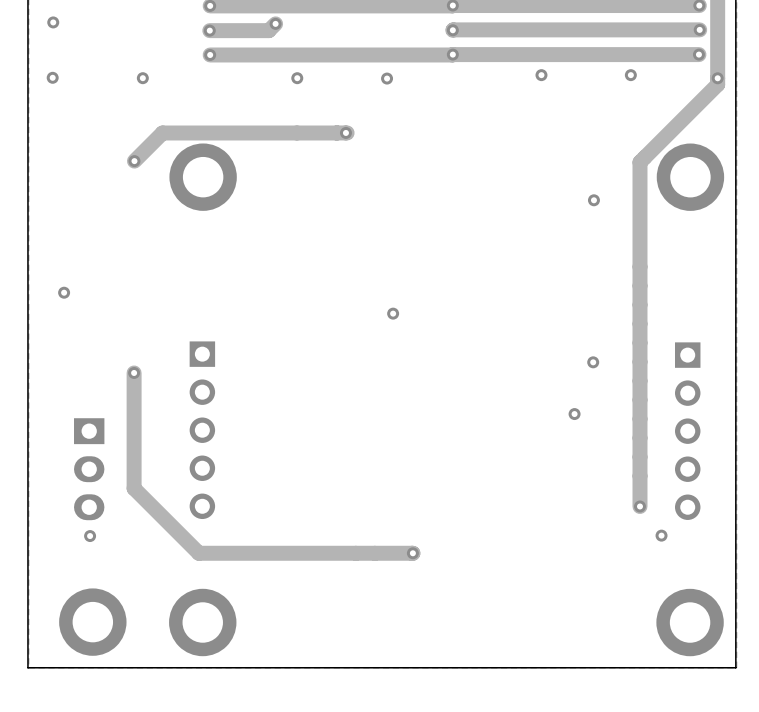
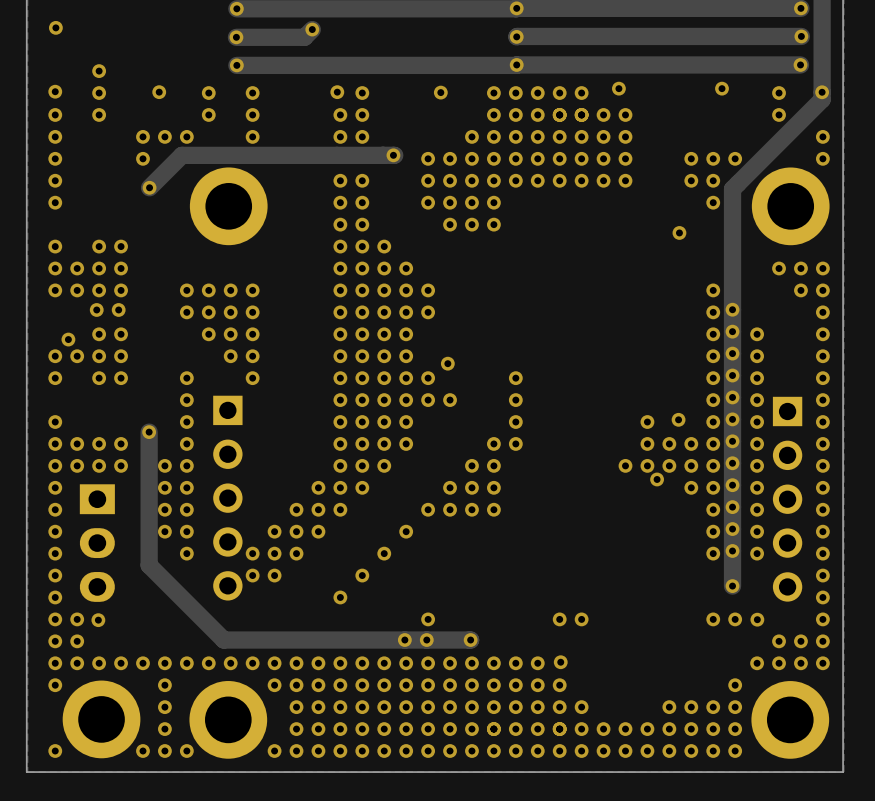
via: none -> (99, 71)
via: none -> (99, 93)
via: none -> (208, 93)
via: none -> (252, 93)
via: none -> (362, 93)
via: none -> (493, 93)
via: none -> (515, 93)
via: none -> (537, 93)
via: none -> (559, 93)
via: none -> (581, 93)
via: none -> (779, 93)
via: none -> (55, 114)
via: none -> (99, 114)
via: none -> (208, 114)
via: none -> (252, 114)
via: none -> (340, 114)
via: none -> (362, 114)
via: none -> (493, 114)
via: none -> (515, 114)
via: none -> (537, 114)
via: none -> (559, 114)
via: none -> (581, 114)
via: none -> (603, 114)
via: none -> (625, 114)
via: none -> (779, 114)
via: none -> (55, 136)
via: none -> (142, 136)
via: none -> (164, 136)
via: none -> (186, 136)
via: none -> (252, 136)
via: none -> (340, 136)
via: none -> (362, 136)
via: none -> (471, 136)
via: none -> (493, 136)
via: none -> (515, 136)
via: none -> (537, 136)
via: none -> (559, 136)
via: none -> (581, 136)
via: none -> (603, 136)
via: none -> (625, 136)
via: none -> (822, 136)
via: none -> (55, 158)
via: none -> (142, 158)
via: none -> (428, 158)
via: none -> (450, 158)
via: none -> (471, 158)
via: none -> (493, 158)
via: none -> (515, 158)
via: none -> (537, 158)
via: none -> (559, 158)
via: none -> (581, 158)
via: none -> (603, 158)
via: none -> (625, 158)
via: none -> (691, 158)
via: none -> (713, 158)
via: none -> (735, 158)
via: none -> (822, 158)
via: none -> (55, 180)
via: none -> (340, 180)
via: none -> (362, 180)
via: none -> (428, 180)
via: none -> (450, 180)
via: none -> (471, 180)
via: none -> (493, 180)
via: none -> (515, 180)
via: none -> (537, 180)
via: none -> (559, 180)
via: none -> (581, 180)
via: none -> (603, 180)
via: none -> (625, 180)
via: none -> (691, 180)
via: none -> (713, 180)
via: none -> (55, 202)
via: none -> (340, 202)
via: none -> (362, 202)
via: none -> (428, 202)
via: none -> (450, 202)
via: none -> (471, 202)
via: none -> (493, 202)
via: none -> (713, 202)
via: none -> (340, 224)
via: none -> (362, 224)
via: none -> (450, 224)
via: none -> (471, 224)
via: none -> (493, 224)
via: none -> (55, 246)
via: none -> (99, 246)
via: none -> (121, 246)
via: none -> (340, 246)
via: none -> (362, 246)
via: none -> (384, 246)
via: none -> (55, 268)
via: none -> (77, 268)
via: none -> (99, 268)
via: none -> (121, 268)
via: none -> (340, 268)
via: none -> (362, 268)
via: none -> (384, 268)
via: none -> (406, 268)
via: none -> (779, 268)
via: none -> (800, 268)
via: none -> (822, 268)
via: none -> (55, 290)
via: none -> (77, 290)
via: none -> (99, 290)
via: none -> (121, 290)
via: none -> (186, 290)
via: none -> (208, 290)
via: none -> (230, 290)
via: none -> (252, 290)
via: none -> (340, 290)
via: none -> (362, 290)
via: none -> (384, 290)
via: none -> (406, 290)
via: none -> (428, 290)
via: none -> (713, 290)
via: none -> (800, 290)
via: none -> (822, 290)
via: none -> (732, 309)
via: none -> (96, 309)
via: none -> (118, 309)
via: none -> (186, 312)
via: none -> (208, 312)
via: none -> (230, 312)
via: none -> (252, 312)
via: none -> (340, 312)
via: none -> (362, 312)
via: none -> (384, 312)
via: none -> (406, 312)
via: none -> (428, 312)
via: none -> (713, 312)
via: none -> (822, 312)
via: none -> (732, 331)
via: none -> (99, 334)
via: none -> (121, 334)
via: none -> (208, 334)
via: none -> (230, 334)
via: none -> (252, 334)
via: none -> (340, 334)
via: none -> (362, 334)
via: none -> (384, 334)
via: none -> (406, 334)
via: none -> (713, 334)
via: none -> (757, 334)
via: none -> (822, 334)
via: none -> (732, 353)
via: none -> (55, 356)
via: none -> (77, 356)
via: none -> (99, 356)
via: none -> (121, 356)
via: none -> (230, 356)
via: none -> (252, 356)
via: none -> (340, 356)
via: none -> (362, 356)
via: none -> (384, 356)
via: none -> (406, 356)
via: none -> (713, 356)
via: none -> (757, 356)
via: none -> (822, 356)
via: none -> (732, 375)
via: none -> (55, 378)
via: none -> (99, 378)
via: none -> (121, 378)
via: none -> (186, 378)
via: none -> (252, 378)
via: none -> (340, 378)
via: none -> (362, 378)
via: none -> (384, 378)
via: none -> (406, 378)
via: none -> (428, 378)
via: none -> (515, 378)
via: none -> (713, 378)
via: none -> (757, 378)
via: none -> (822, 378)
via: none -> (732, 397)
via: none -> (186, 400)
via: none -> (340, 400)
via: none -> (362, 400)
via: none -> (384, 400)
via: none -> (406, 400)
via: none -> (428, 400)
via: none -> (450, 400)
via: none -> (515, 400)
via: none -> (713, 400)
via: none -> (757, 400)
via: none -> (822, 400)
via: none -> (732, 419)
via: none -> (55, 422)
via: none -> (186, 422)
via: none -> (340, 422)
via: none -> (362, 422)
via: none -> (384, 422)
via: none -> (406, 422)
via: none -> (515, 422)
via: none -> (647, 422)
via: none -> (713, 422)
via: none -> (757, 422)
via: none -> (822, 422)
via: none -> (732, 441)
via: none -> (55, 443)
via: none -> (77, 443)
via: none -> (99, 443)
via: none -> (121, 443)
via: none -> (186, 443)
via: none -> (340, 443)
via: none -> (362, 443)
via: none -> (384, 443)
via: none -> (406, 443)
via: none -> (493, 443)
via: none -> (515, 443)
via: none -> (647, 443)
via: none -> (669, 443)
via: none -> (691, 443)
via: none -> (713, 443)
via: none -> (757, 443)
via: none -> (822, 443)
via: none -> (732, 463)
via: none -> (55, 465)
via: none -> (77, 465)
via: none -> (99, 465)
via: none -> (121, 465)
via: none -> (164, 465)
via: none -> (186, 465)
via: none -> (340, 465)
via: none -> (362, 465)
via: none -> (384, 465)
via: none -> (471, 465)
via: none -> (493, 465)
via: none -> (625, 465)
via: none -> (647, 465)
via: none -> (669, 465)
via: none -> (691, 465)
via: none -> (713, 465)
via: none -> (757, 465)
via: none -> (822, 465)
via: none -> (732, 485)
via: none -> (55, 487)
via: none -> (164, 487)
via: none -> (186, 487)
via: none -> (318, 487)
via: none -> (340, 487)
via: none -> (362, 487)
via: none -> (450, 487)
via: none -> (471, 487)
via: none -> (493, 487)
via: none -> (691, 487)
via: none -> (713, 487)
via: none -> (757, 487)
via: none -> (822, 487)
via: none -> (732, 507)
via: none -> (55, 509)
via: none -> (164, 509)
via: none -> (186, 509)
via: none -> (296, 509)
via: none -> (318, 509)
via: none -> (340, 509)
via: none -> (428, 509)
via: none -> (450, 509)
via: none -> (471, 509)
via: none -> (493, 509)
via: none -> (713, 509)
via: none -> (757, 509)
via: none -> (822, 509)
via: none -> (732, 529)
via: none -> (55, 531)
via: none -> (164, 531)
via: none -> (186, 531)
via: none -> (274, 531)
via: none -> (296, 531)
via: none -> (318, 531)
via: none -> (406, 531)
via: none -> (713, 531)
via: none -> (757, 531)
via: none -> (822, 531)
via: none -> (732, 550)
via: none -> (55, 553)
via: none -> (186, 553)
via: none -> (252, 553)
via: none -> (274, 553)
via: none -> (296, 553)
via: none -> (384, 553)
via: none -> (713, 553)
via: none -> (757, 553)
via: none -> (822, 553)
via: none -> (55, 575)
via: none -> (252, 575)
via: none -> (274, 575)
via: none -> (362, 575)
via: none -> (822, 575)
via: none -> (55, 597)
via: none -> (340, 597)
via: none -> (822, 597)
via: none -> (55, 619)
via: none -> (77, 619)
via: none -> (428, 619)
via: none -> (559, 619)
via: none -> (581, 619)
via: none -> (713, 619)
via: none -> (735, 619)
via: none -> (822, 619)
via: none -> (404, 640)
via: none -> (426, 640)
via: none -> (55, 641)
via: none -> (77, 641)
via: none -> (779, 641)
via: none -> (800, 641)
via: none -> (822, 641)
via: none -> (560, 662)
via: none -> (55, 663)
via: none -> (77, 663)
via: none -> (99, 663)
via: none -> (121, 663)
via: none -> (142, 663)
via: none -> (164, 663)
via: none -> (186, 663)
via: none -> (208, 663)
via: none -> (230, 663)
via: none -> (252, 663)
via: none -> (274, 663)
via: none -> (296, 663)
via: none -> (318, 663)
via: none -> (340, 663)
via: none -> (362, 663)
via: none -> (384, 663)
via: none -> (406, 663)
via: none -> (428, 663)
via: none -> (450, 663)
via: none -> (471, 663)
via: none -> (493, 663)
via: none -> (515, 663)
via: none -> (537, 663)
via: none -> (757, 663)
via: none -> (779, 663)
via: none -> (800, 663)
via: none -> (822, 663)
via: none -> (55, 685)
via: none -> (164, 685)
via: none -> (274, 685)
via: none -> (296, 685)
via: none -> (318, 685)
via: none -> (340, 685)
via: none -> (362, 685)
via: none -> (384, 685)
via: none -> (406, 685)
via: none -> (428, 685)
via: none -> (450, 685)
via: none -> (471, 685)
via: none -> (493, 685)
via: none -> (515, 685)
via: none -> (537, 685)
via: none -> (559, 685)
via: none -> (735, 685)
via: none -> (164, 707)
via: none -> (296, 707)
via: none -> (318, 707)
via: none -> (340, 707)
via: none -> (362, 707)
via: none -> (384, 707)
via: none -> (406, 707)
via: none -> (428, 707)
via: none -> (450, 707)
via: none -> (471, 707)
via: none -> (493, 707)
via: none -> (515, 707)
via: none -> (537, 707)
via: none -> (559, 707)
via: none -> (581, 707)
via: none -> (669, 707)
via: none -> (691, 707)
via: none -> (713, 707)
via: none -> (735, 707)
via: none -> (164, 729)
via: none -> (296, 729)
via: none -> (318, 729)
via: none -> (340, 729)
via: none -> (362, 729)
via: none -> (384, 729)
via: none -> (406, 729)
via: none -> (428, 729)
via: none -> (450, 729)
via: none -> (471, 729)
via: none -> (493, 729)
via: none -> (515, 729)
via: none -> (537, 729)
via: none -> (559, 729)
via: none -> (581, 729)
via: none -> (603, 729)
via: none -> (625, 729)
via: none -> (647, 729)
via: none -> (669, 729)
via: none -> (691, 729)
via: none -> (713, 729)
via: none -> (735, 729)
via: none -> (55, 751)
via: none -> (142, 751)
via: none -> (164, 751)
via: none -> (186, 751)
via: none -> (274, 751)
via: none -> (296, 751)
via: none -> (318, 751)
via: none -> (340, 751)
via: none -> (362, 751)
via: none -> (384, 751)
via: none -> (406, 751)
via: none -> (428, 751)
via: none -> (450, 751)
via: none -> (471, 751)
via: none -> (493, 751)
via: none -> (515, 751)
via: none -> (537, 751)
via: none -> (559, 751)
via: none -> (581, 751)
via: none -> (603, 751)
via: none -> (625, 751)
via: none -> (647, 751)
via: none -> (669, 751)
via: none -> (691, 751)
via: none -> (713, 751)
via: none -> (735, 751)

